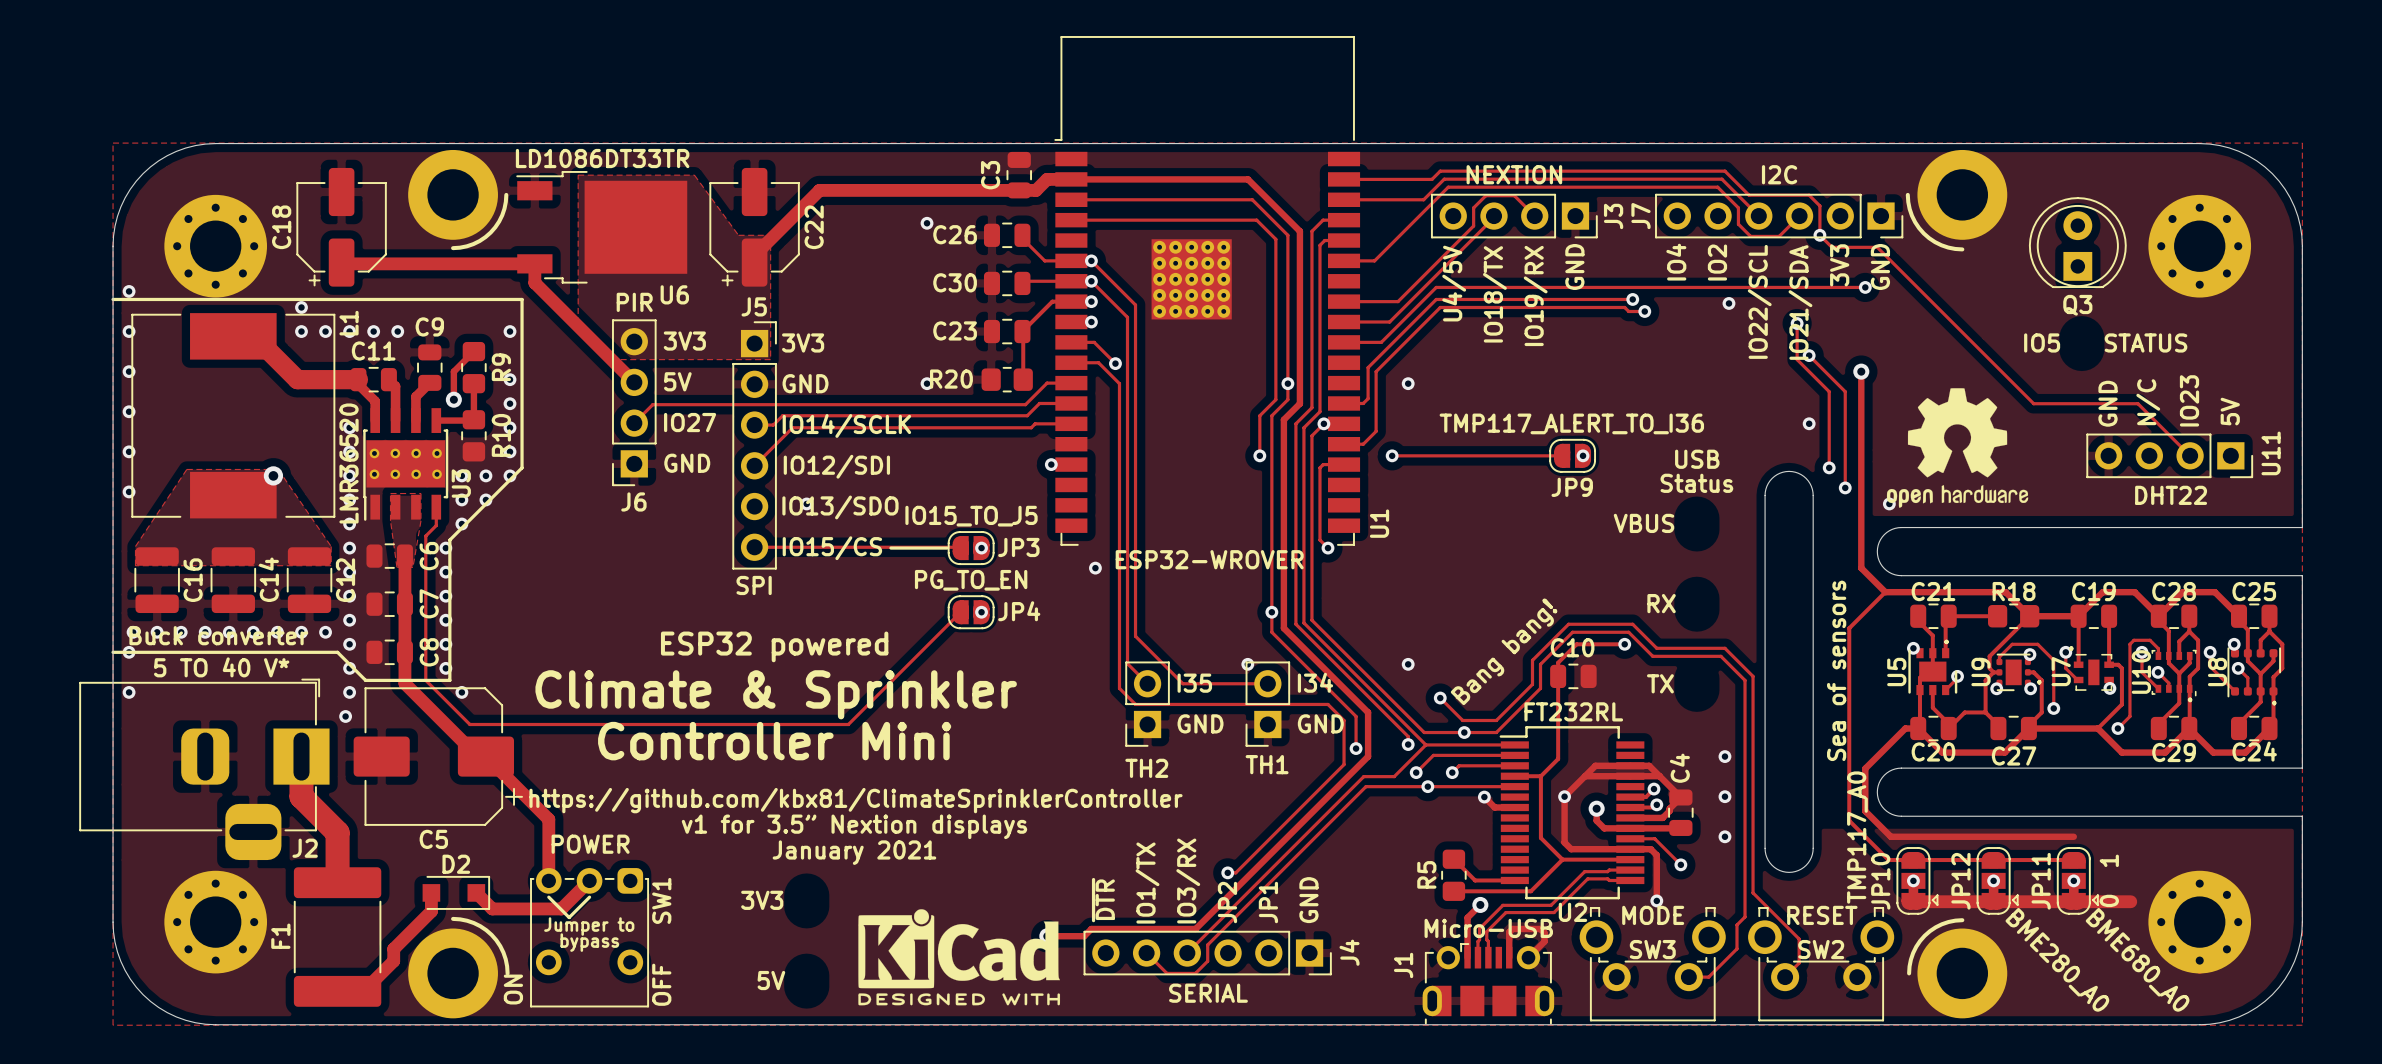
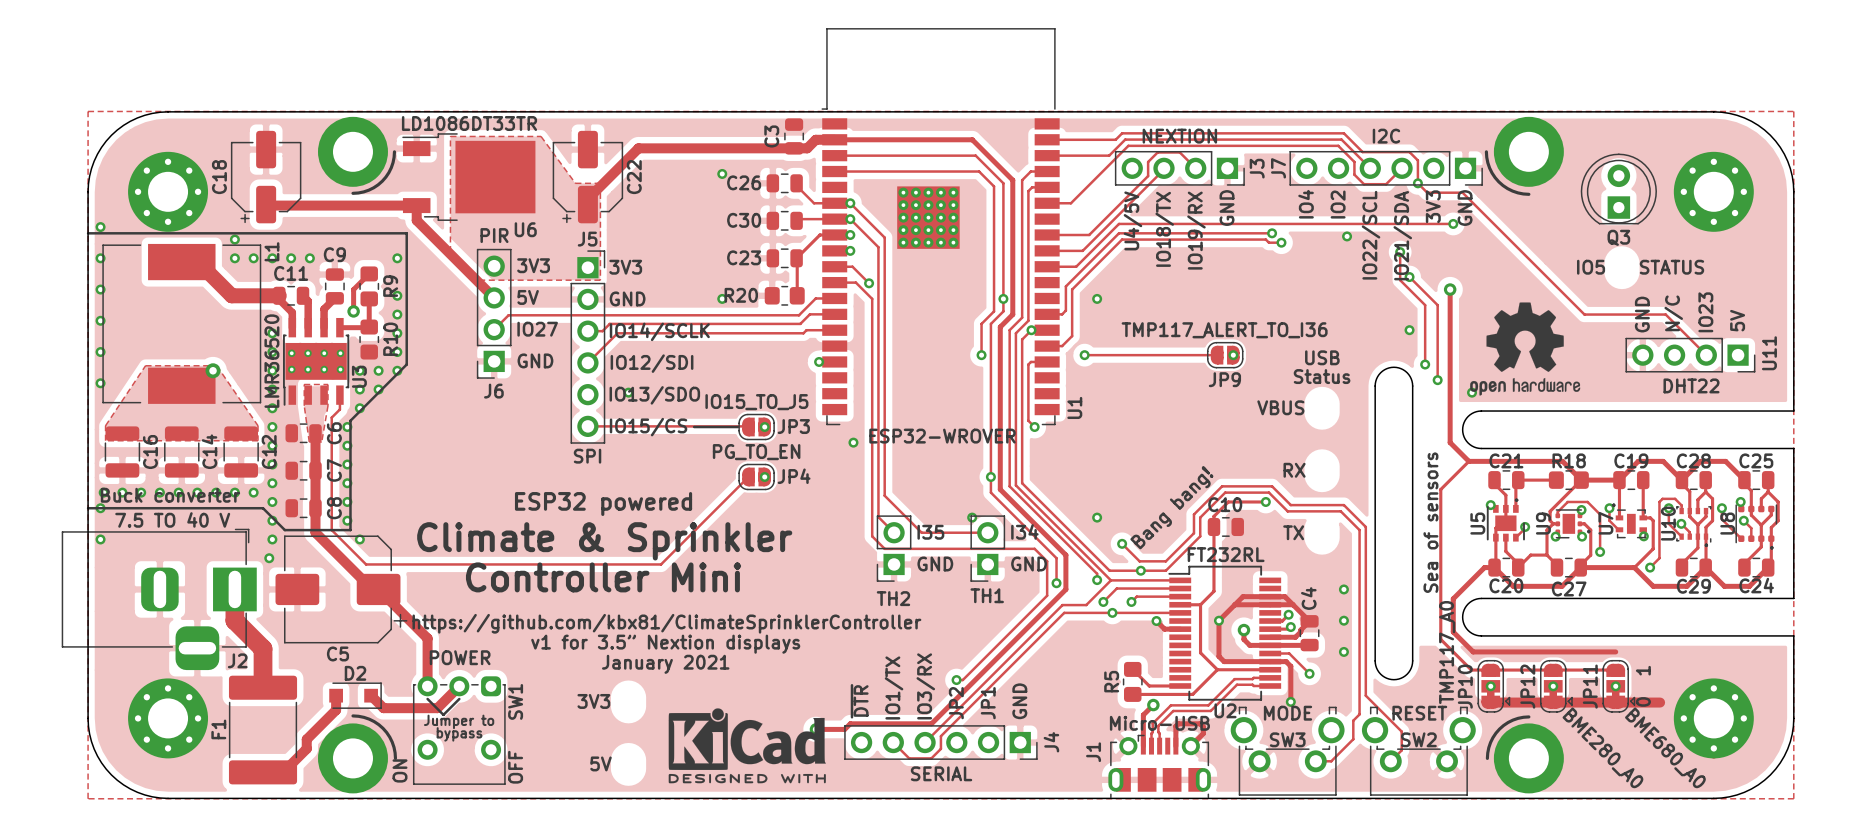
J2 value: 5 TO 40 V* (221, 667) -> 7.5 TO 40 V (172, 519)

